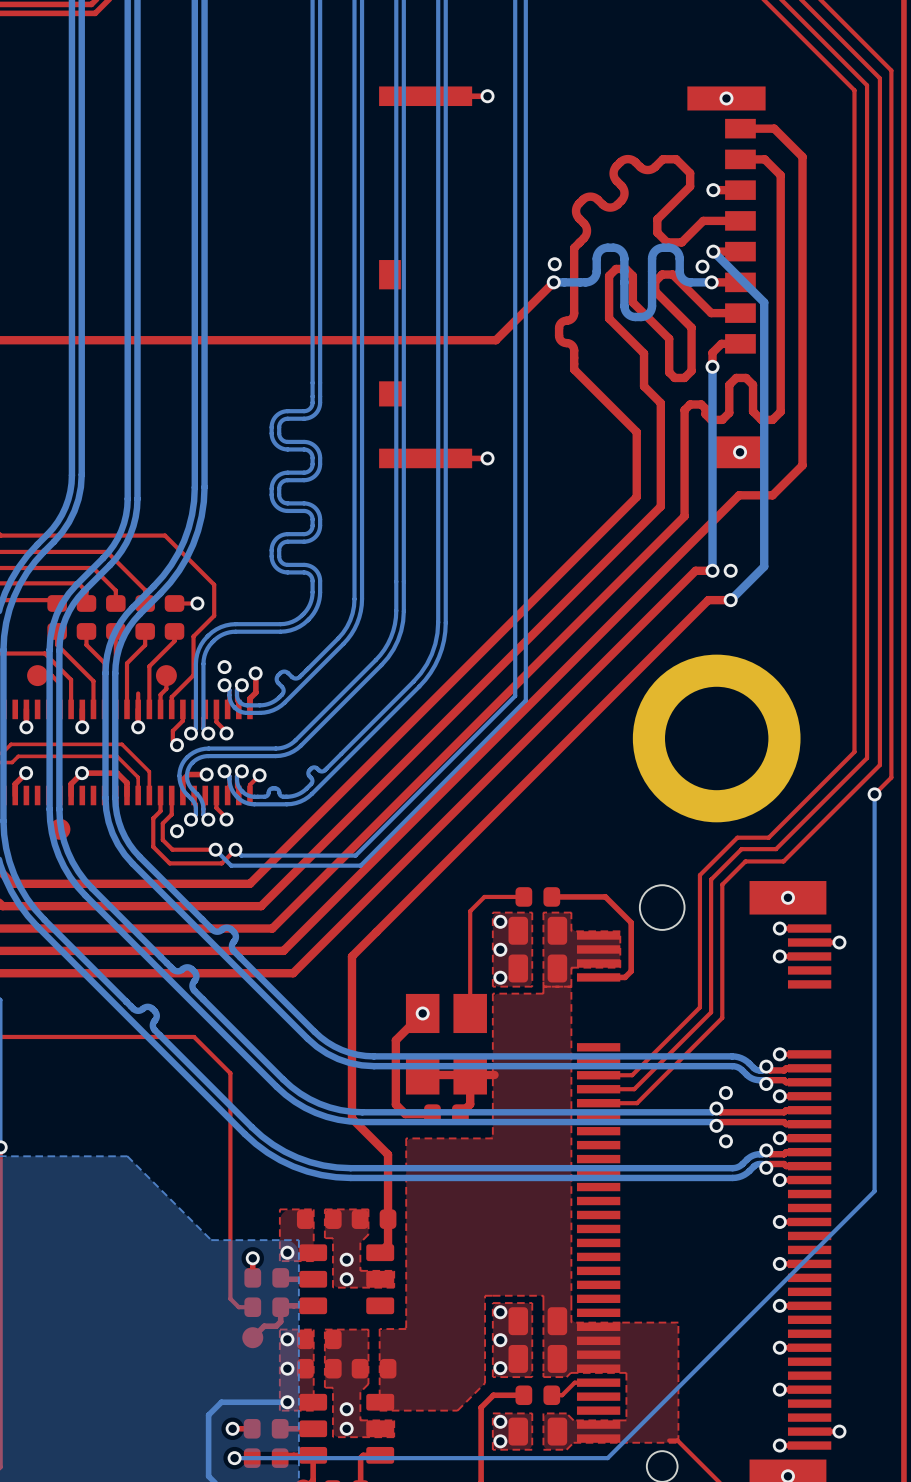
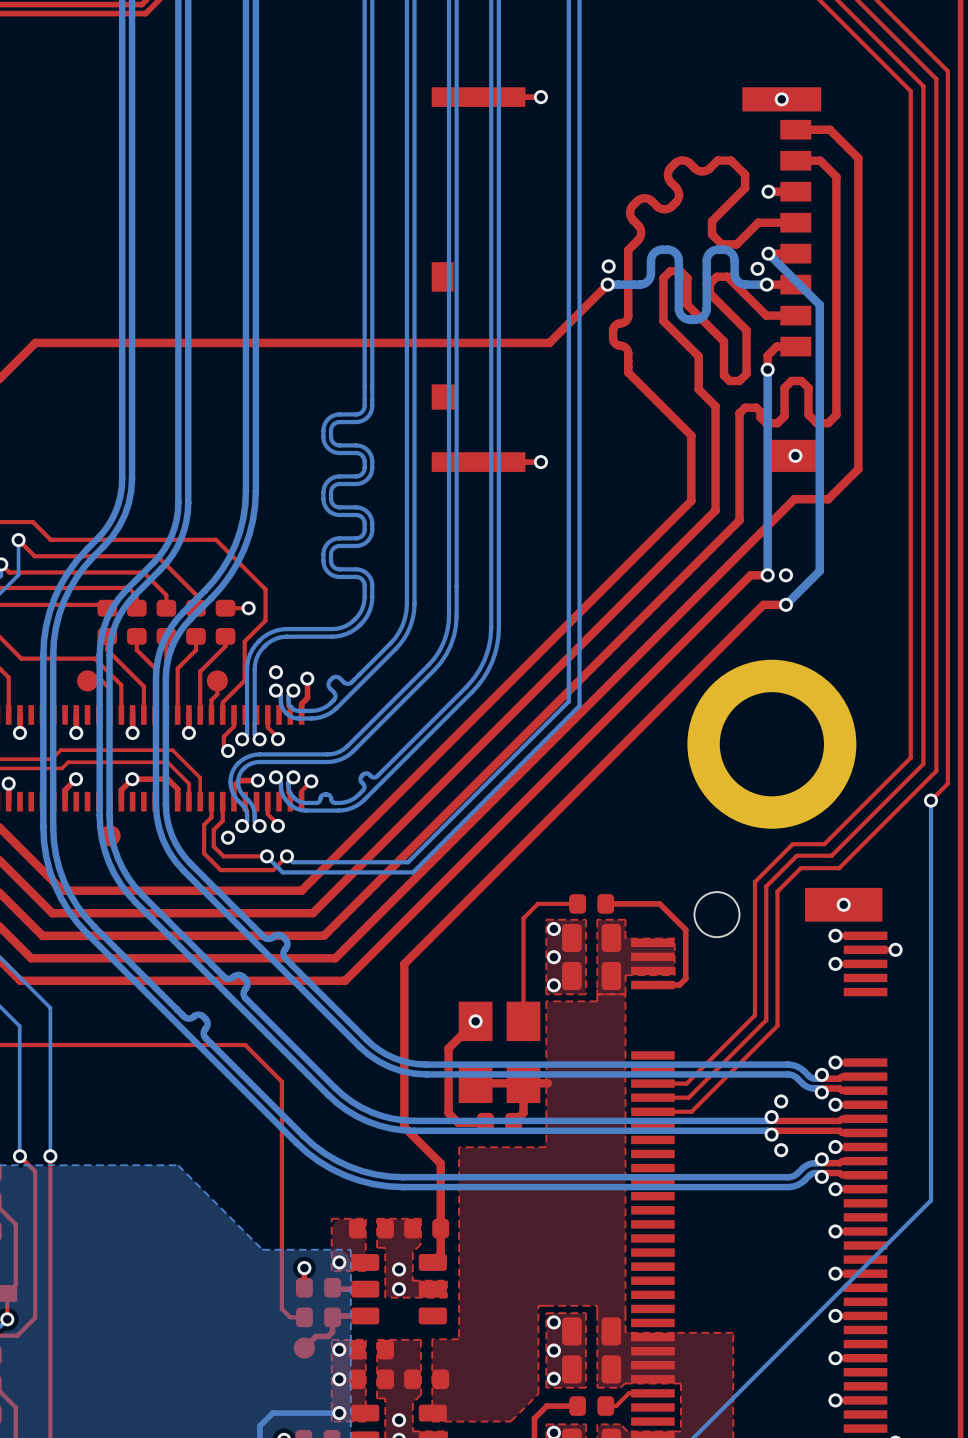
top track: (138, 693) (138, 709) -> none

